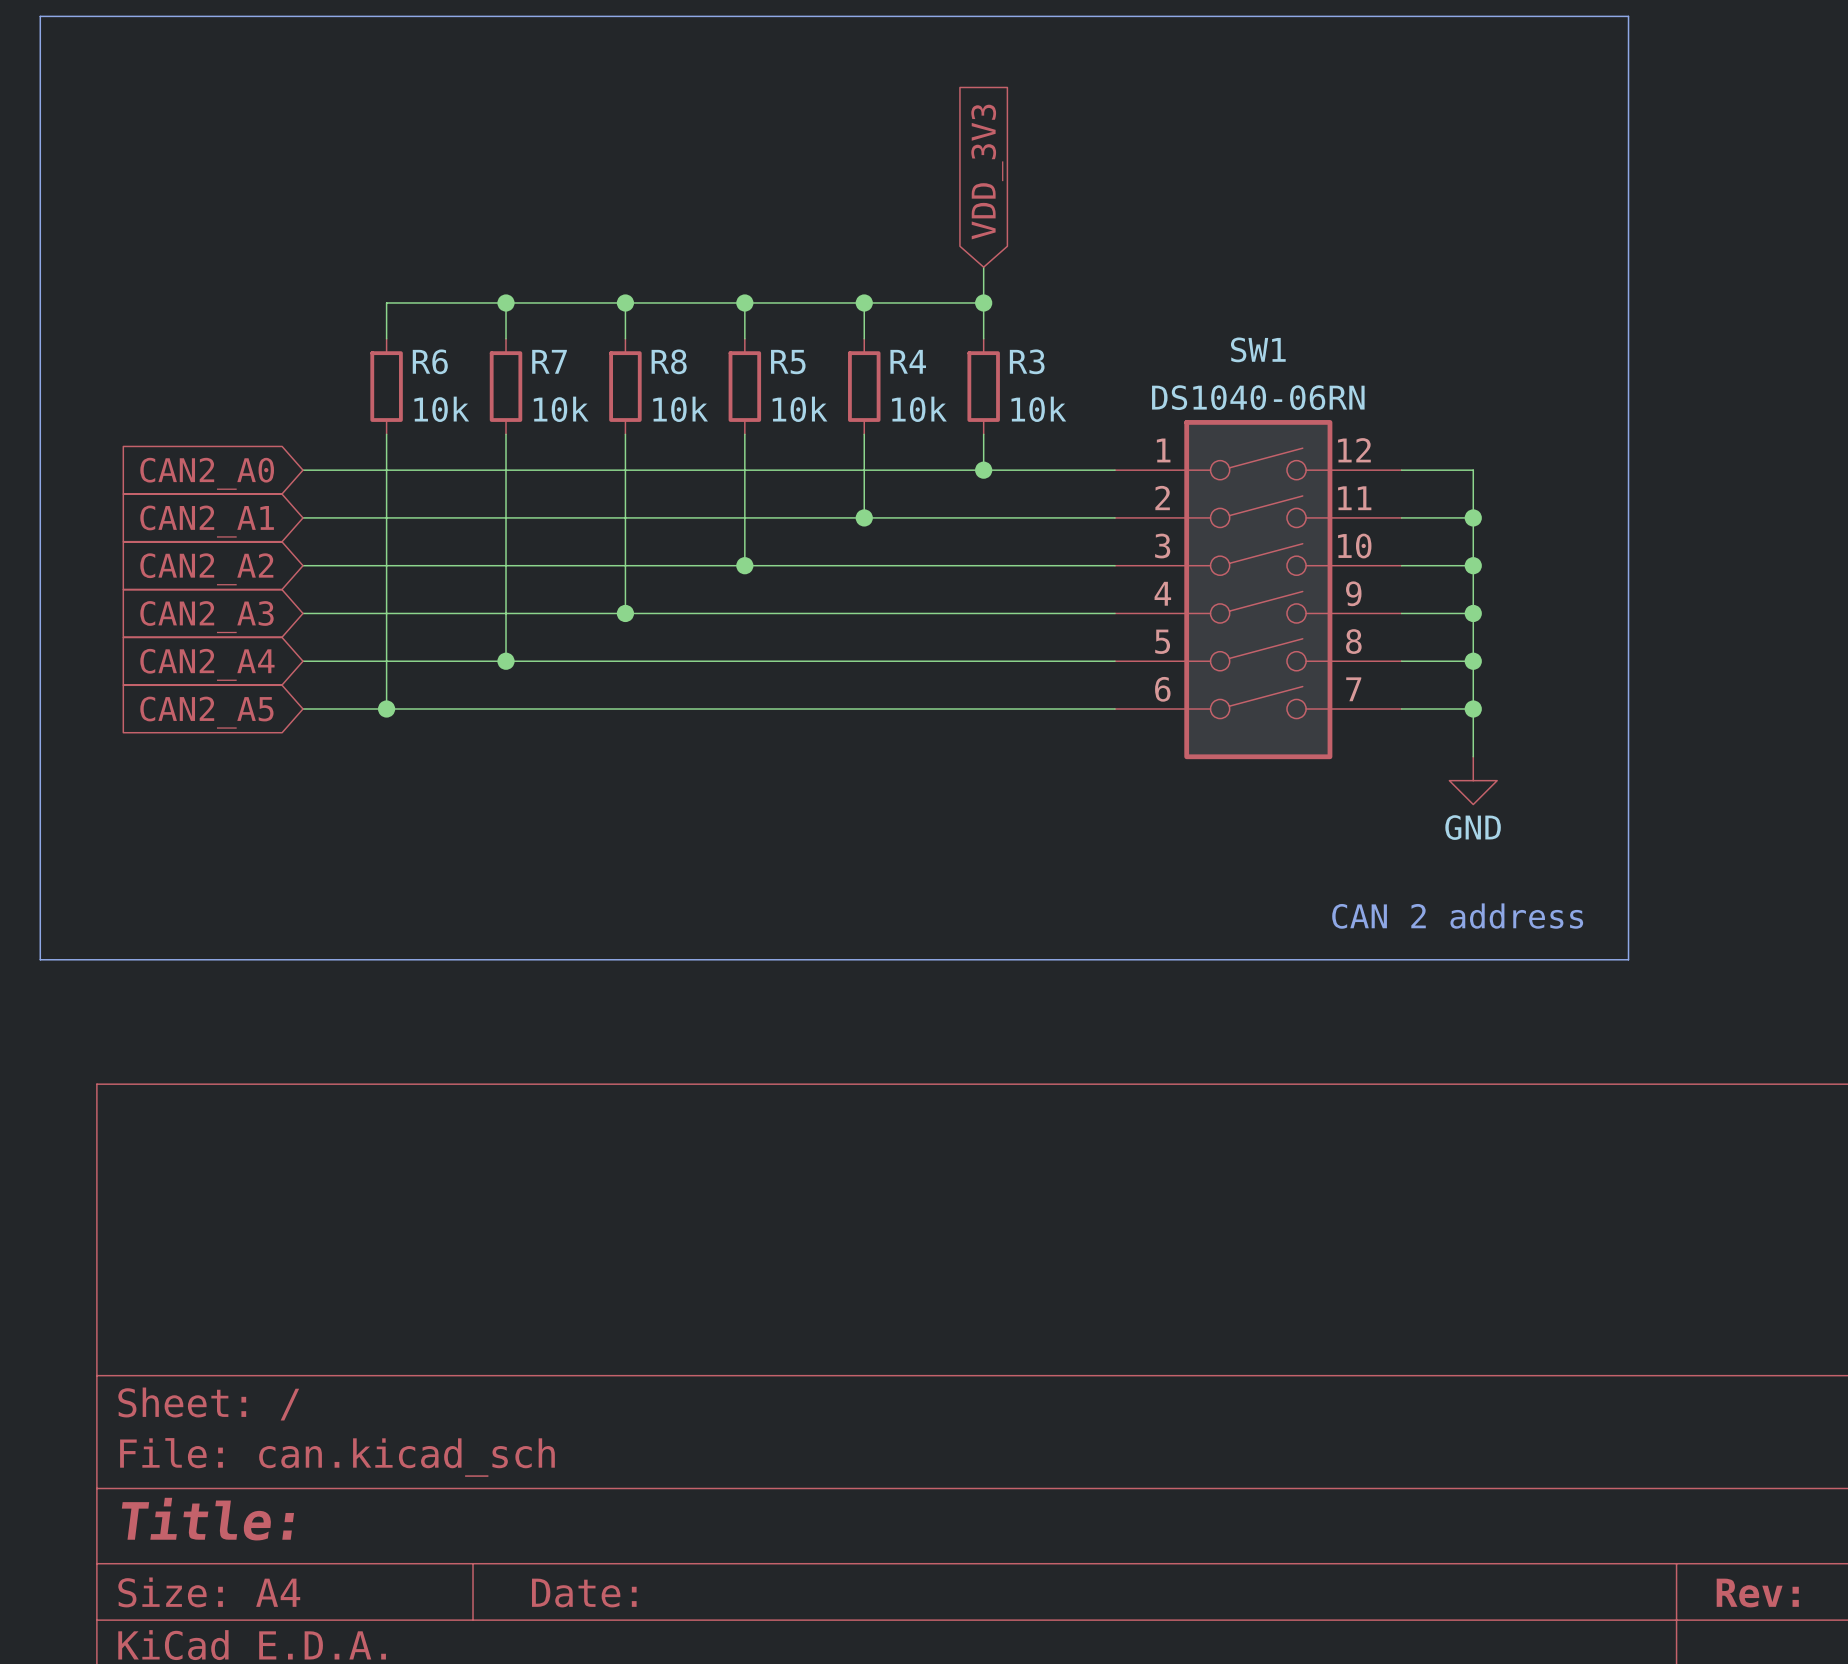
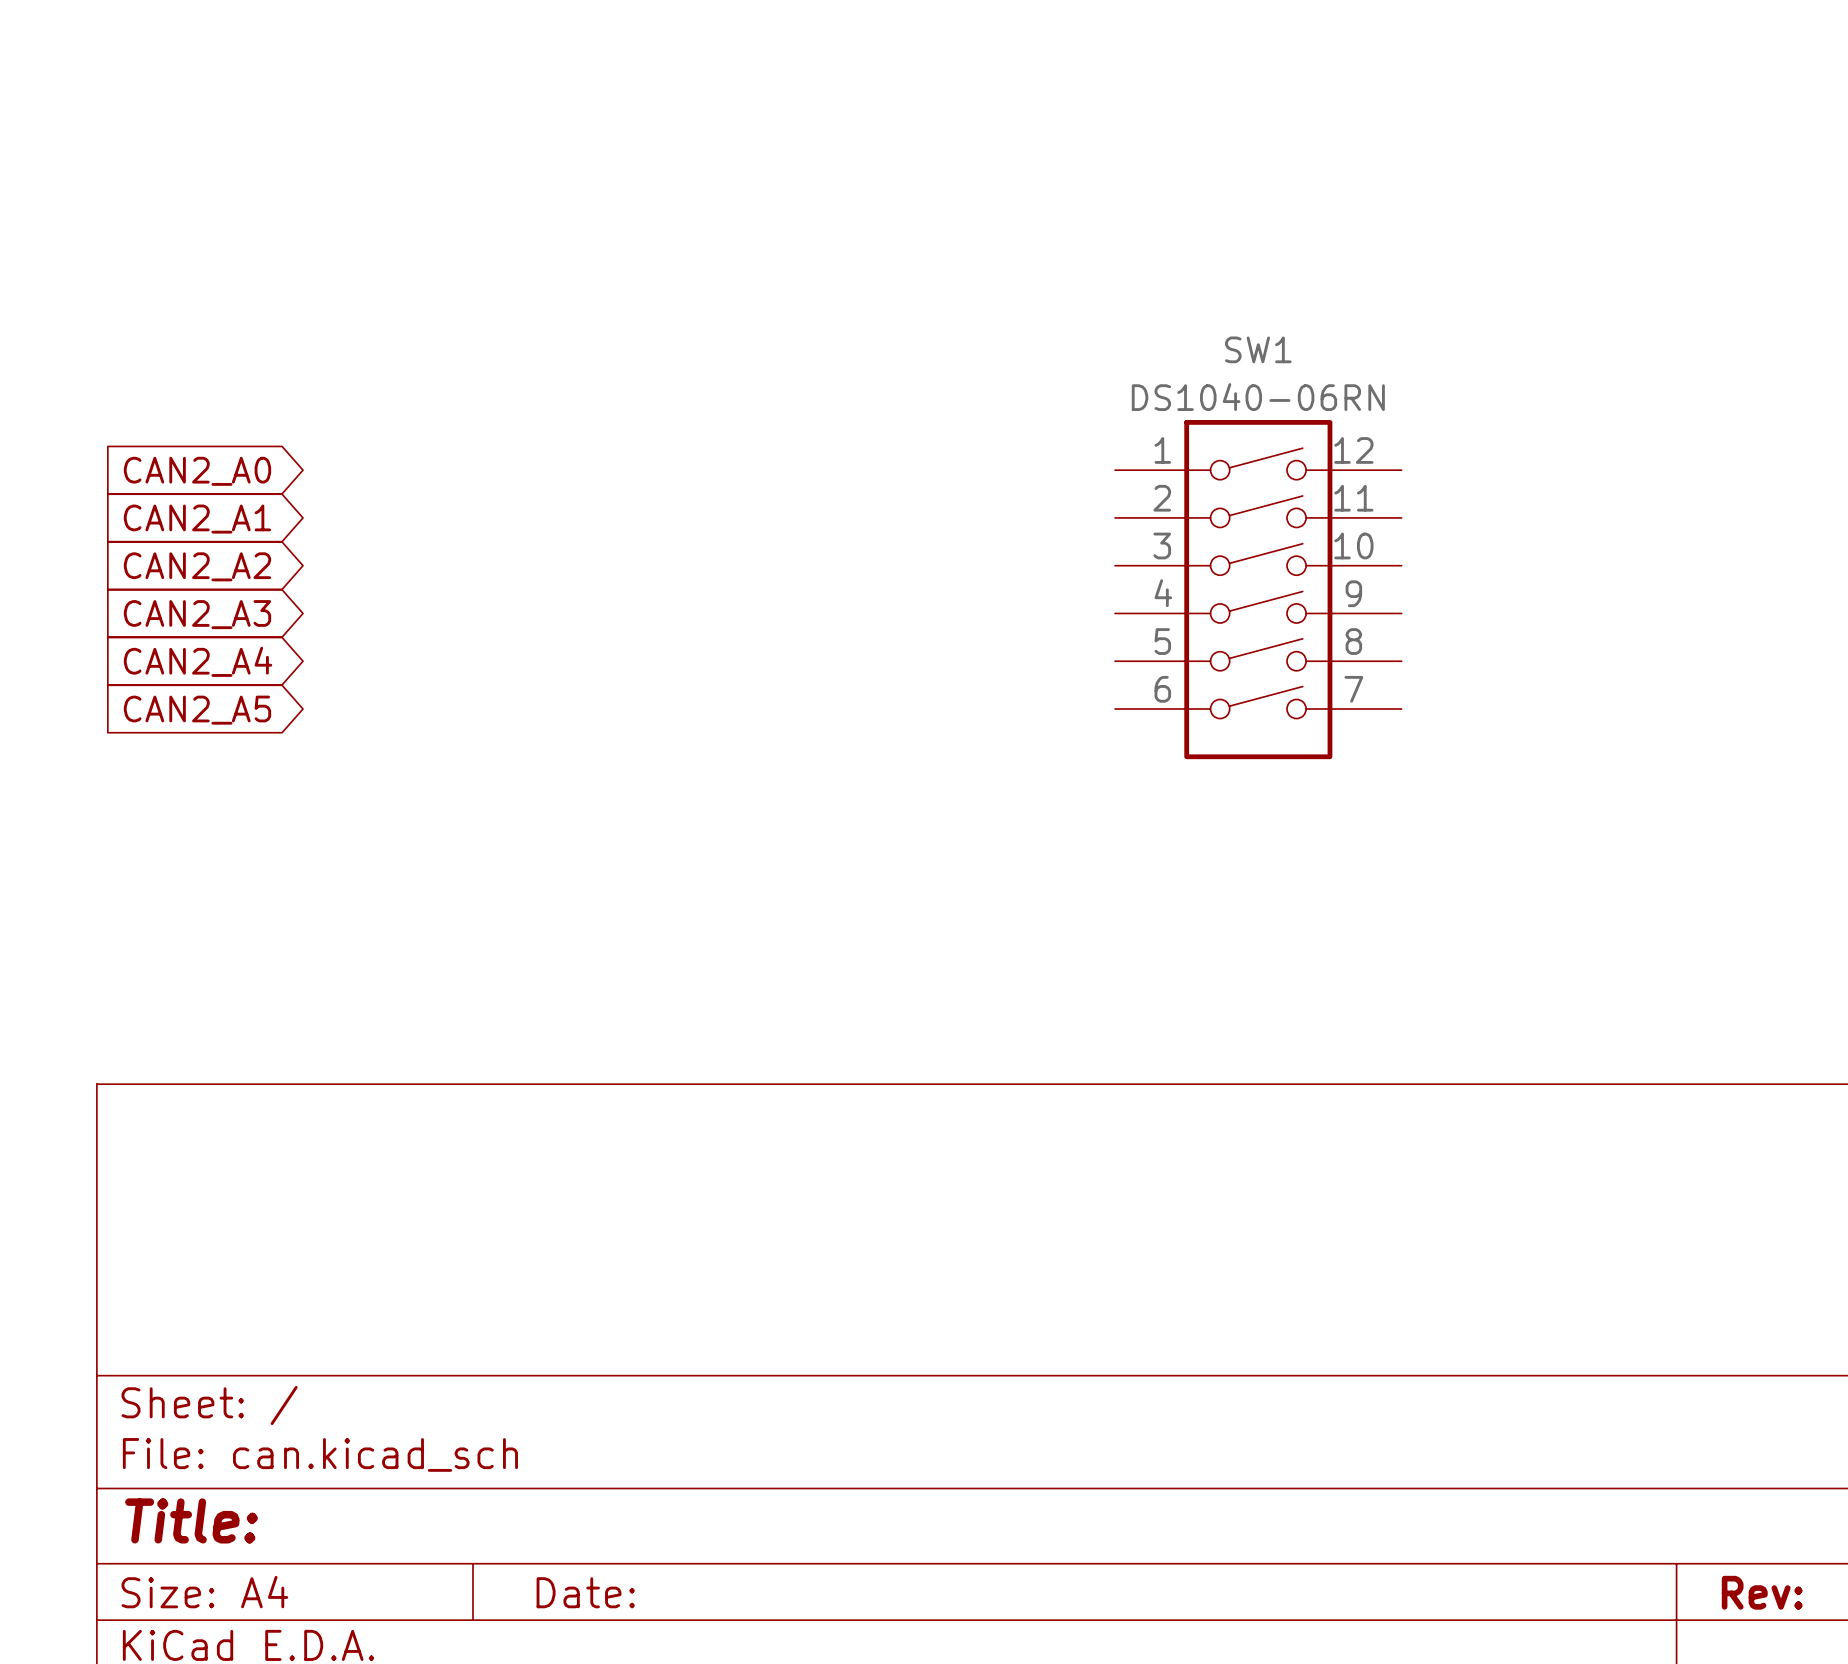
line: (40, 16) (1628, 16) (1628, 959) (40, 959) (40, 16) -> none
global label: VDD_3V3 (987, 172) -> none
wire: (983, 267) (983, 338) -> none
wire: (506, 302) (506, 338) -> none
junction: (506, 302) -> none
wire: (625, 302) (625, 338) -> none
junction: (625, 302) -> none
wire: (744, 302) (744, 338) -> none
junction: (744, 302) -> none
wire: (864, 302) (864, 338) -> none
junction: (864, 302) -> none
wire: (983, 302) (386, 302) (386, 338) -> none
junction: (983, 302) -> none
R6: 10k (386, 386) -> none
R7: 10k (506, 386) -> none
R8: 10k (625, 386) -> none
R5: 10k (744, 386) -> none
R4: 10k (864, 386) -> none
R3: 10k (983, 386) -> none
wire: (386, 434) (386, 709) -> none
wire: (506, 434) (506, 661) -> none
wire: (625, 434) (625, 613) -> none
wire: (744, 434) (744, 565) -> none
wire: (864, 434) (864, 517) -> none
wire: (983, 434) (983, 470) -> none
wire: (303, 470) (1115, 470) -> none
junction: (983, 470) -> none
wire: (1401, 470) (1473, 470) (1473, 756) -> none
wire: (303, 517) (1115, 517) -> none
junction: (864, 517) -> none
wire: (1401, 517) (1473, 517) -> none
junction: (1473, 517) -> none
wire: (303, 565) (1115, 565) -> none
junction: (744, 565) -> none
wire: (1401, 565) (1473, 565) -> none
junction: (1473, 565) -> none
wire: (303, 613) (1115, 613) -> none
junction: (625, 613) -> none
wire: (1401, 613) (1473, 613) -> none
junction: (1473, 613) -> none
wire: (303, 661) (1115, 661) -> none
junction: (506, 661) -> none
wire: (1401, 661) (1473, 661) -> none
junction: (1473, 661) -> none
wire: (303, 709) (1115, 709) -> none
junction: (386, 709) -> none
wire: (1401, 709) (1473, 709) -> none
junction: (1473, 709) -> none
power symbol: GND (1473, 780) -> none
text: CAN 2 address (1457, 916) -> none

